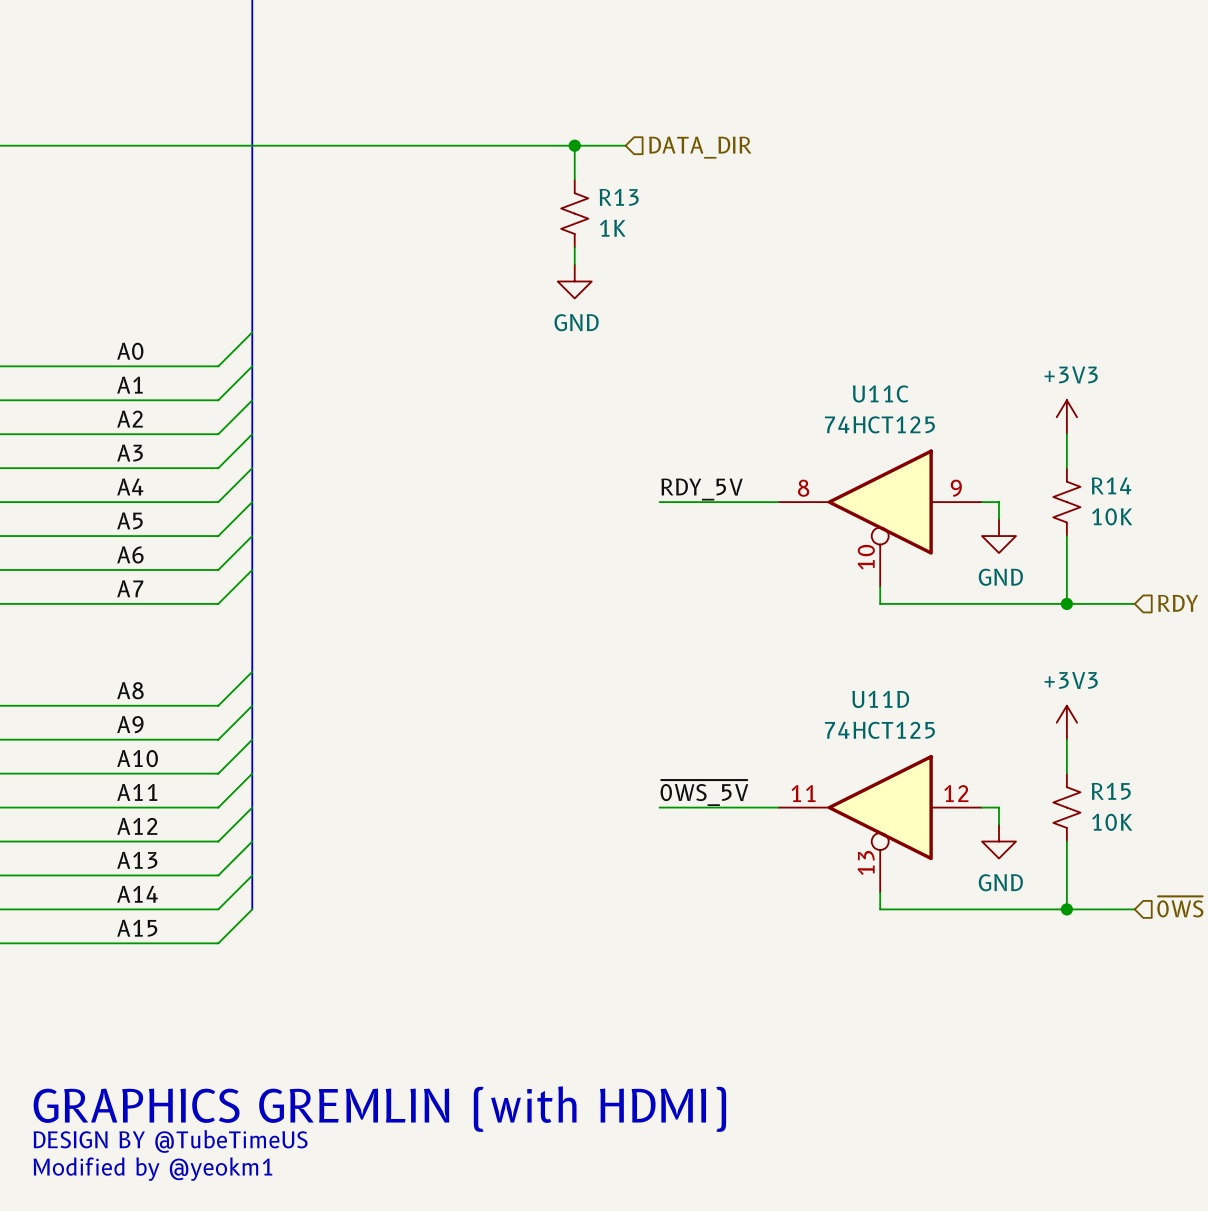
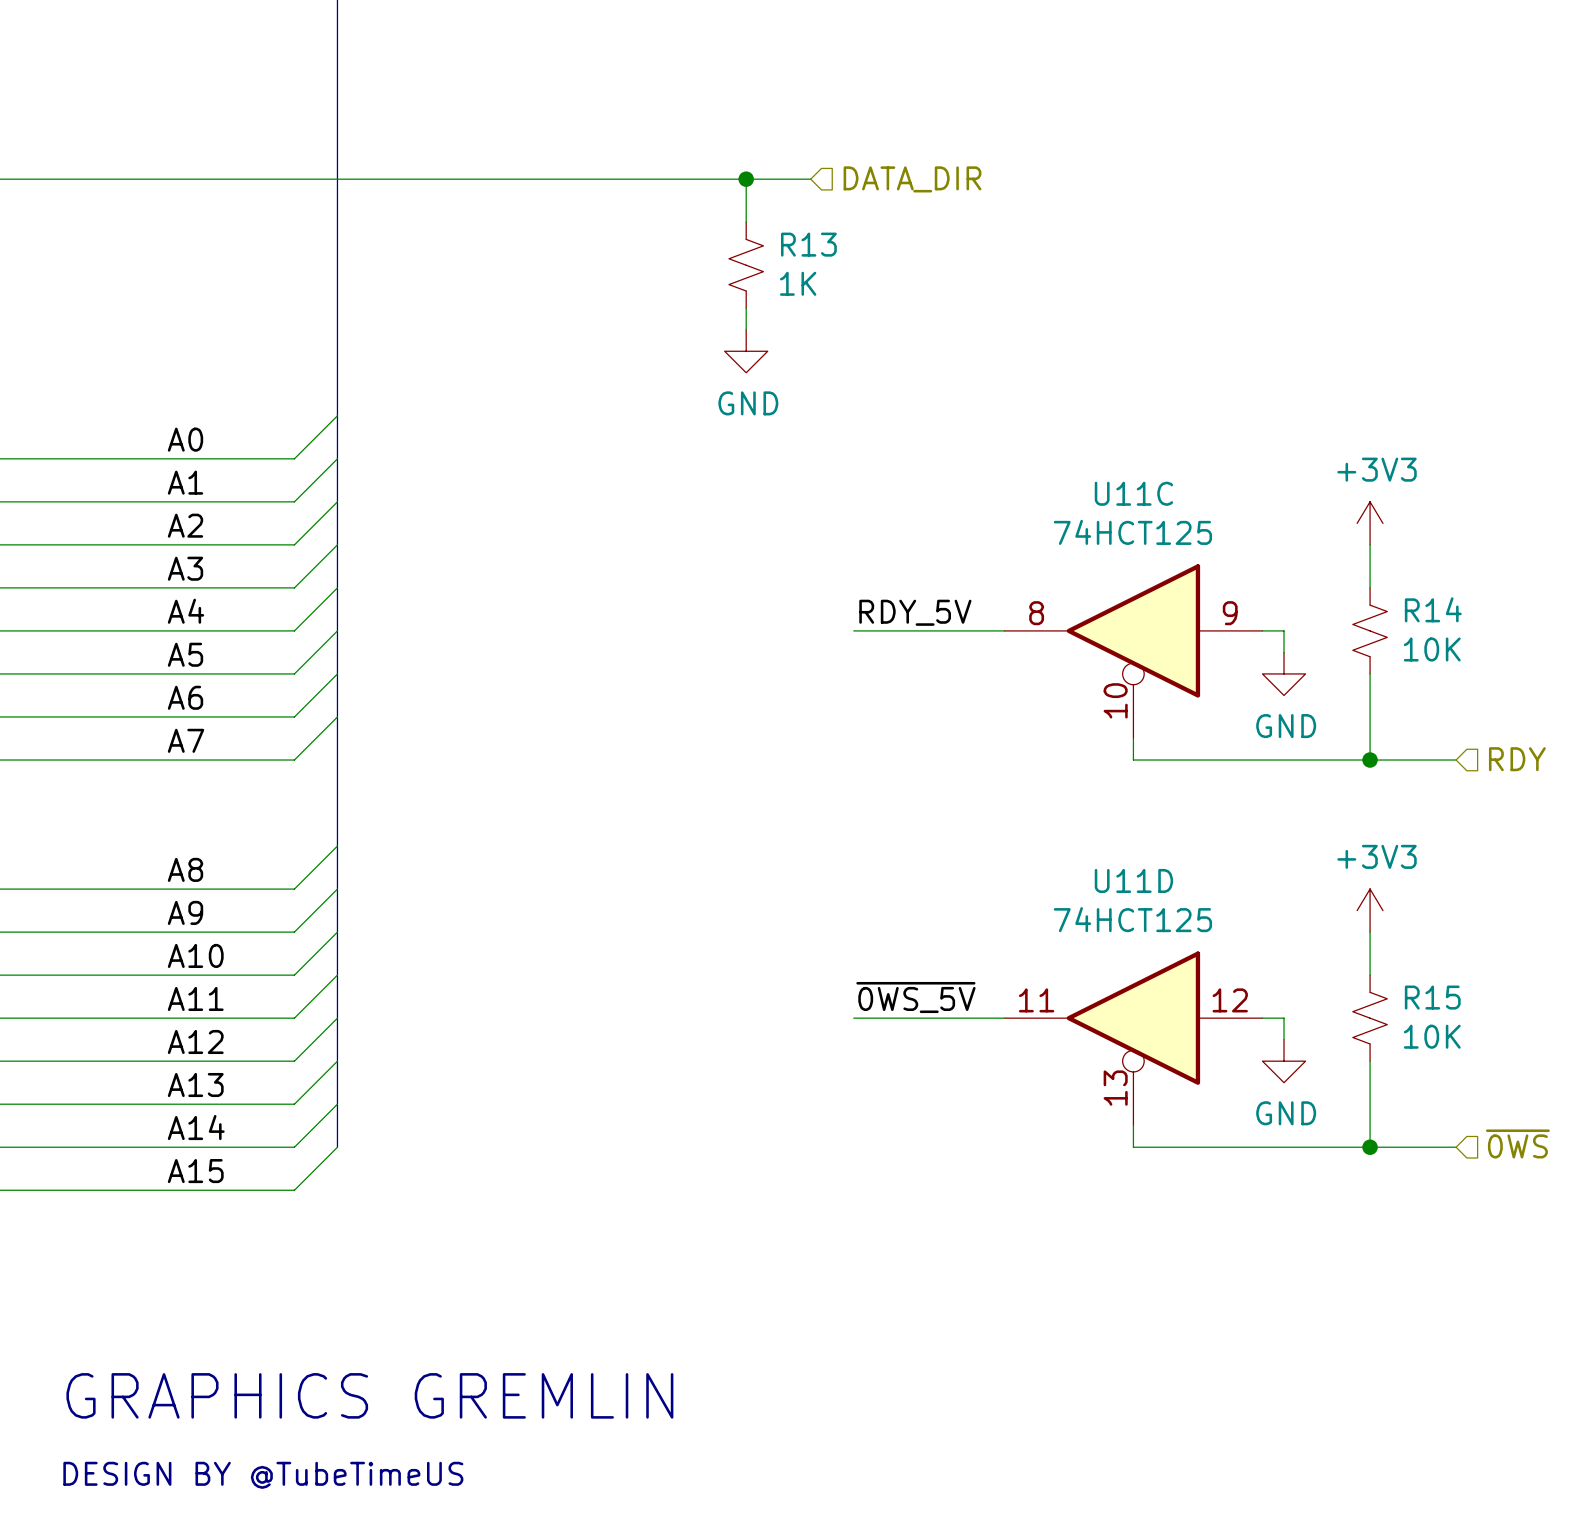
text: GRAPHICS GREMLIN (with HDMI) (379, 1109) -> GRAPHICS GREMLIN (369, 1395)
text: DESIGN BY @TubeTimeUS (170, 1141) -> none
text: Modified by @yeokm1 (152, 1169) -> DESIGN BY @TubeTimeUS (263, 1475)

